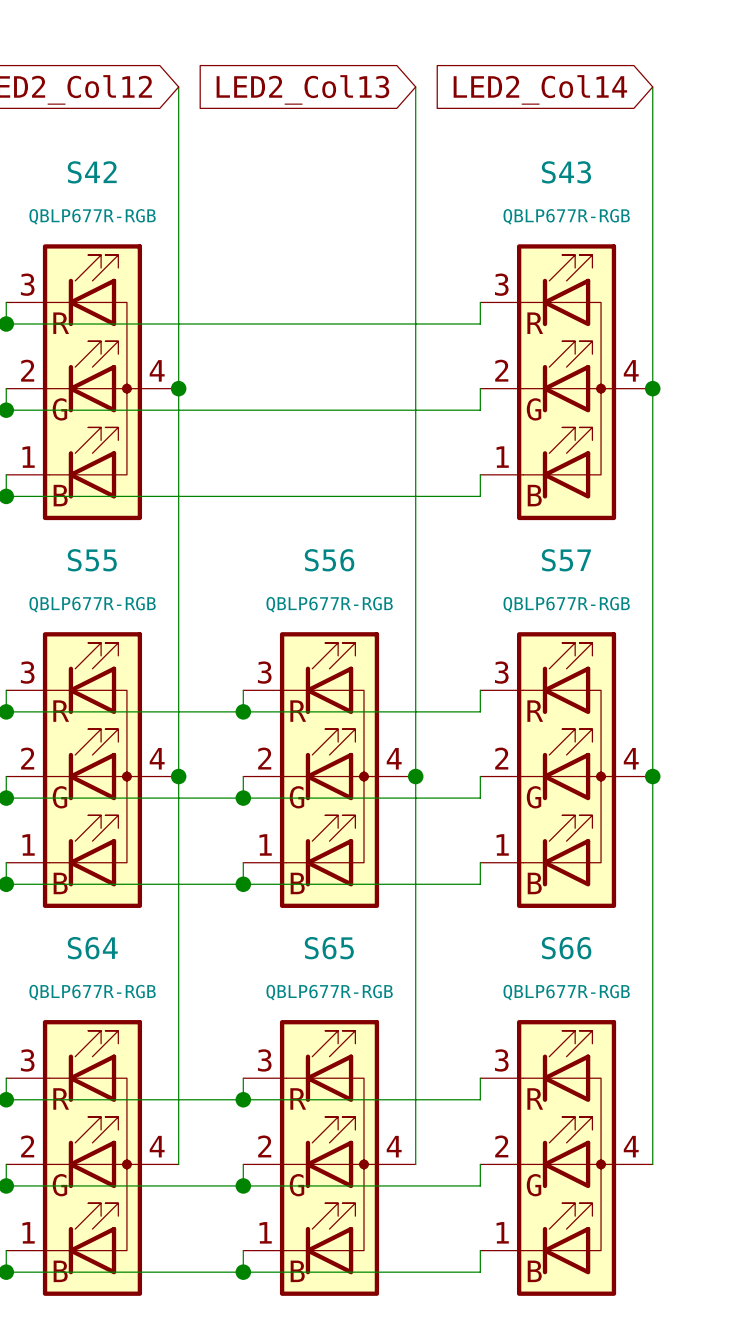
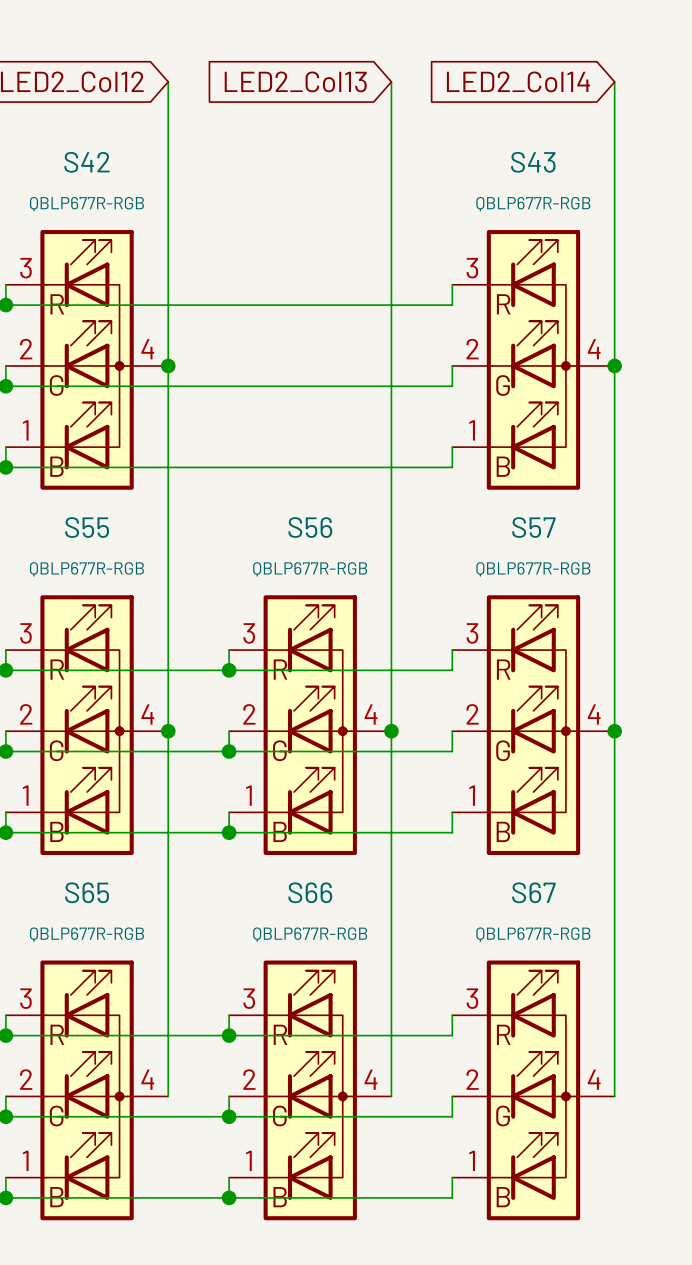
S64 name: S64 (92, 948) -> S65 (87, 892)
S65 name: S65 (329, 948) -> S66 (310, 892)
S66 name: S66 (566, 948) -> S67 (533, 892)

